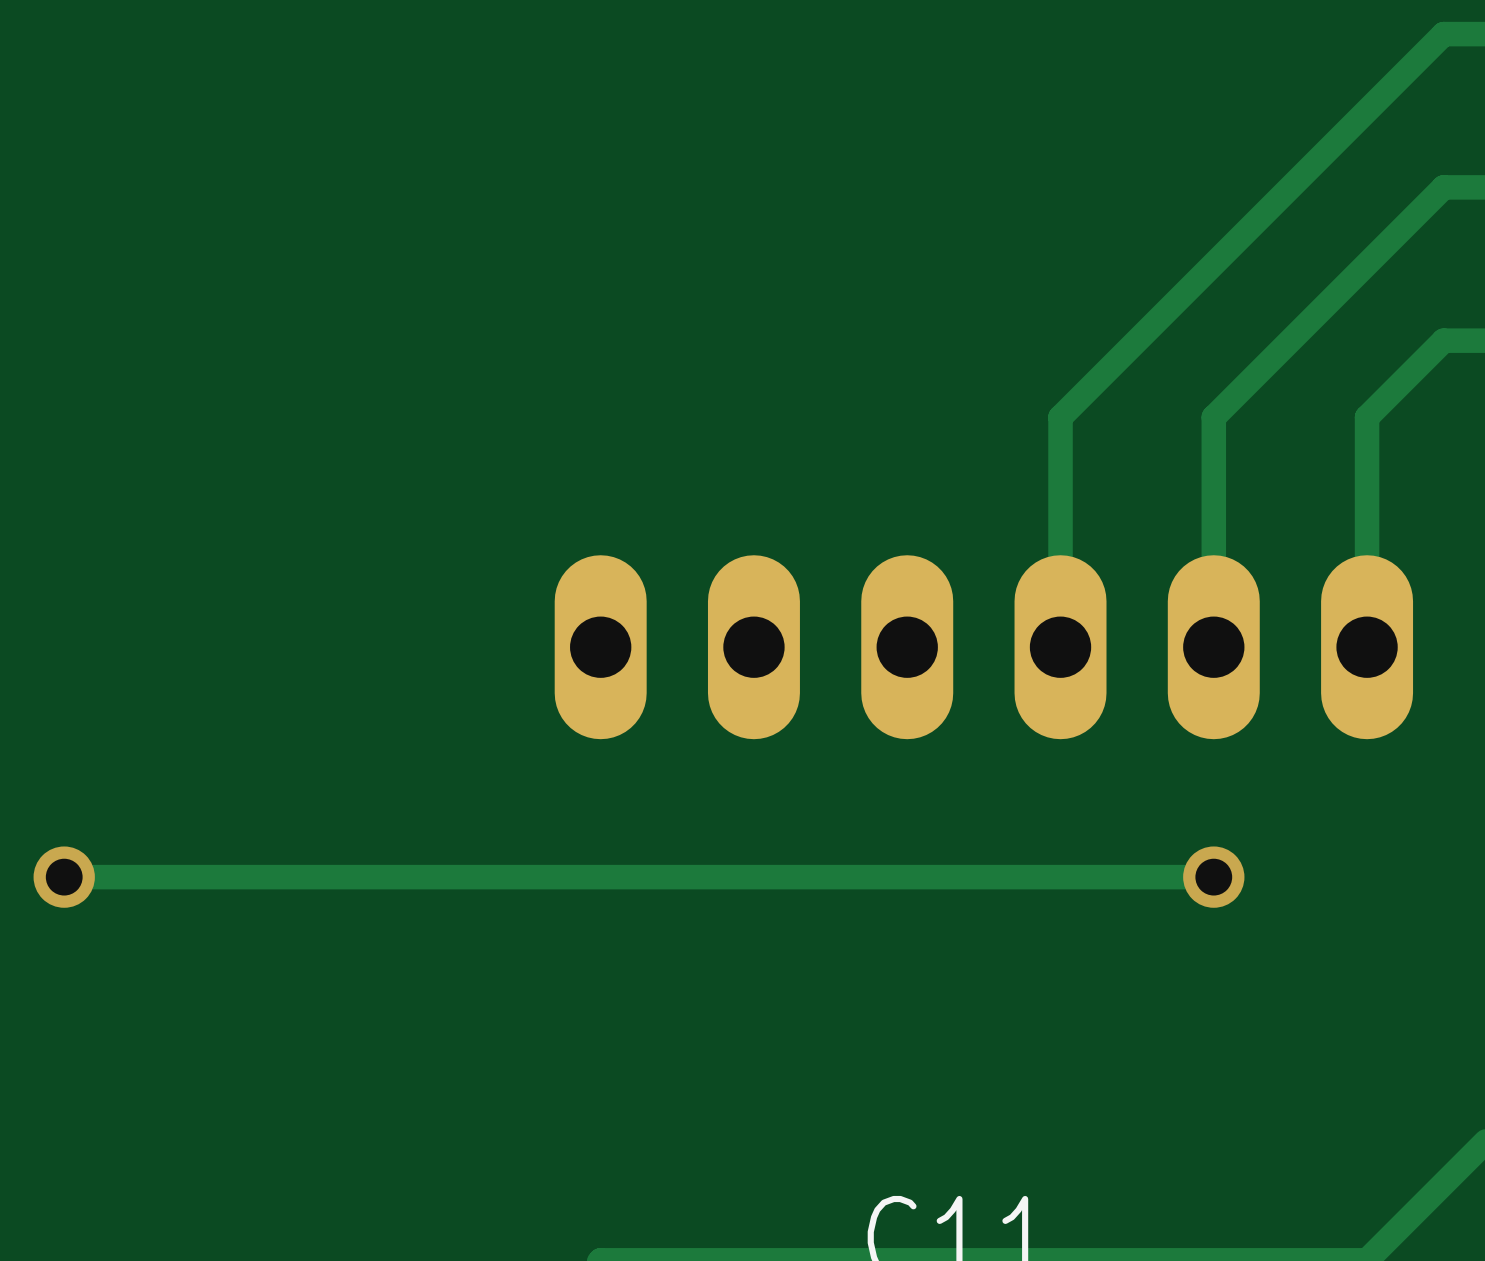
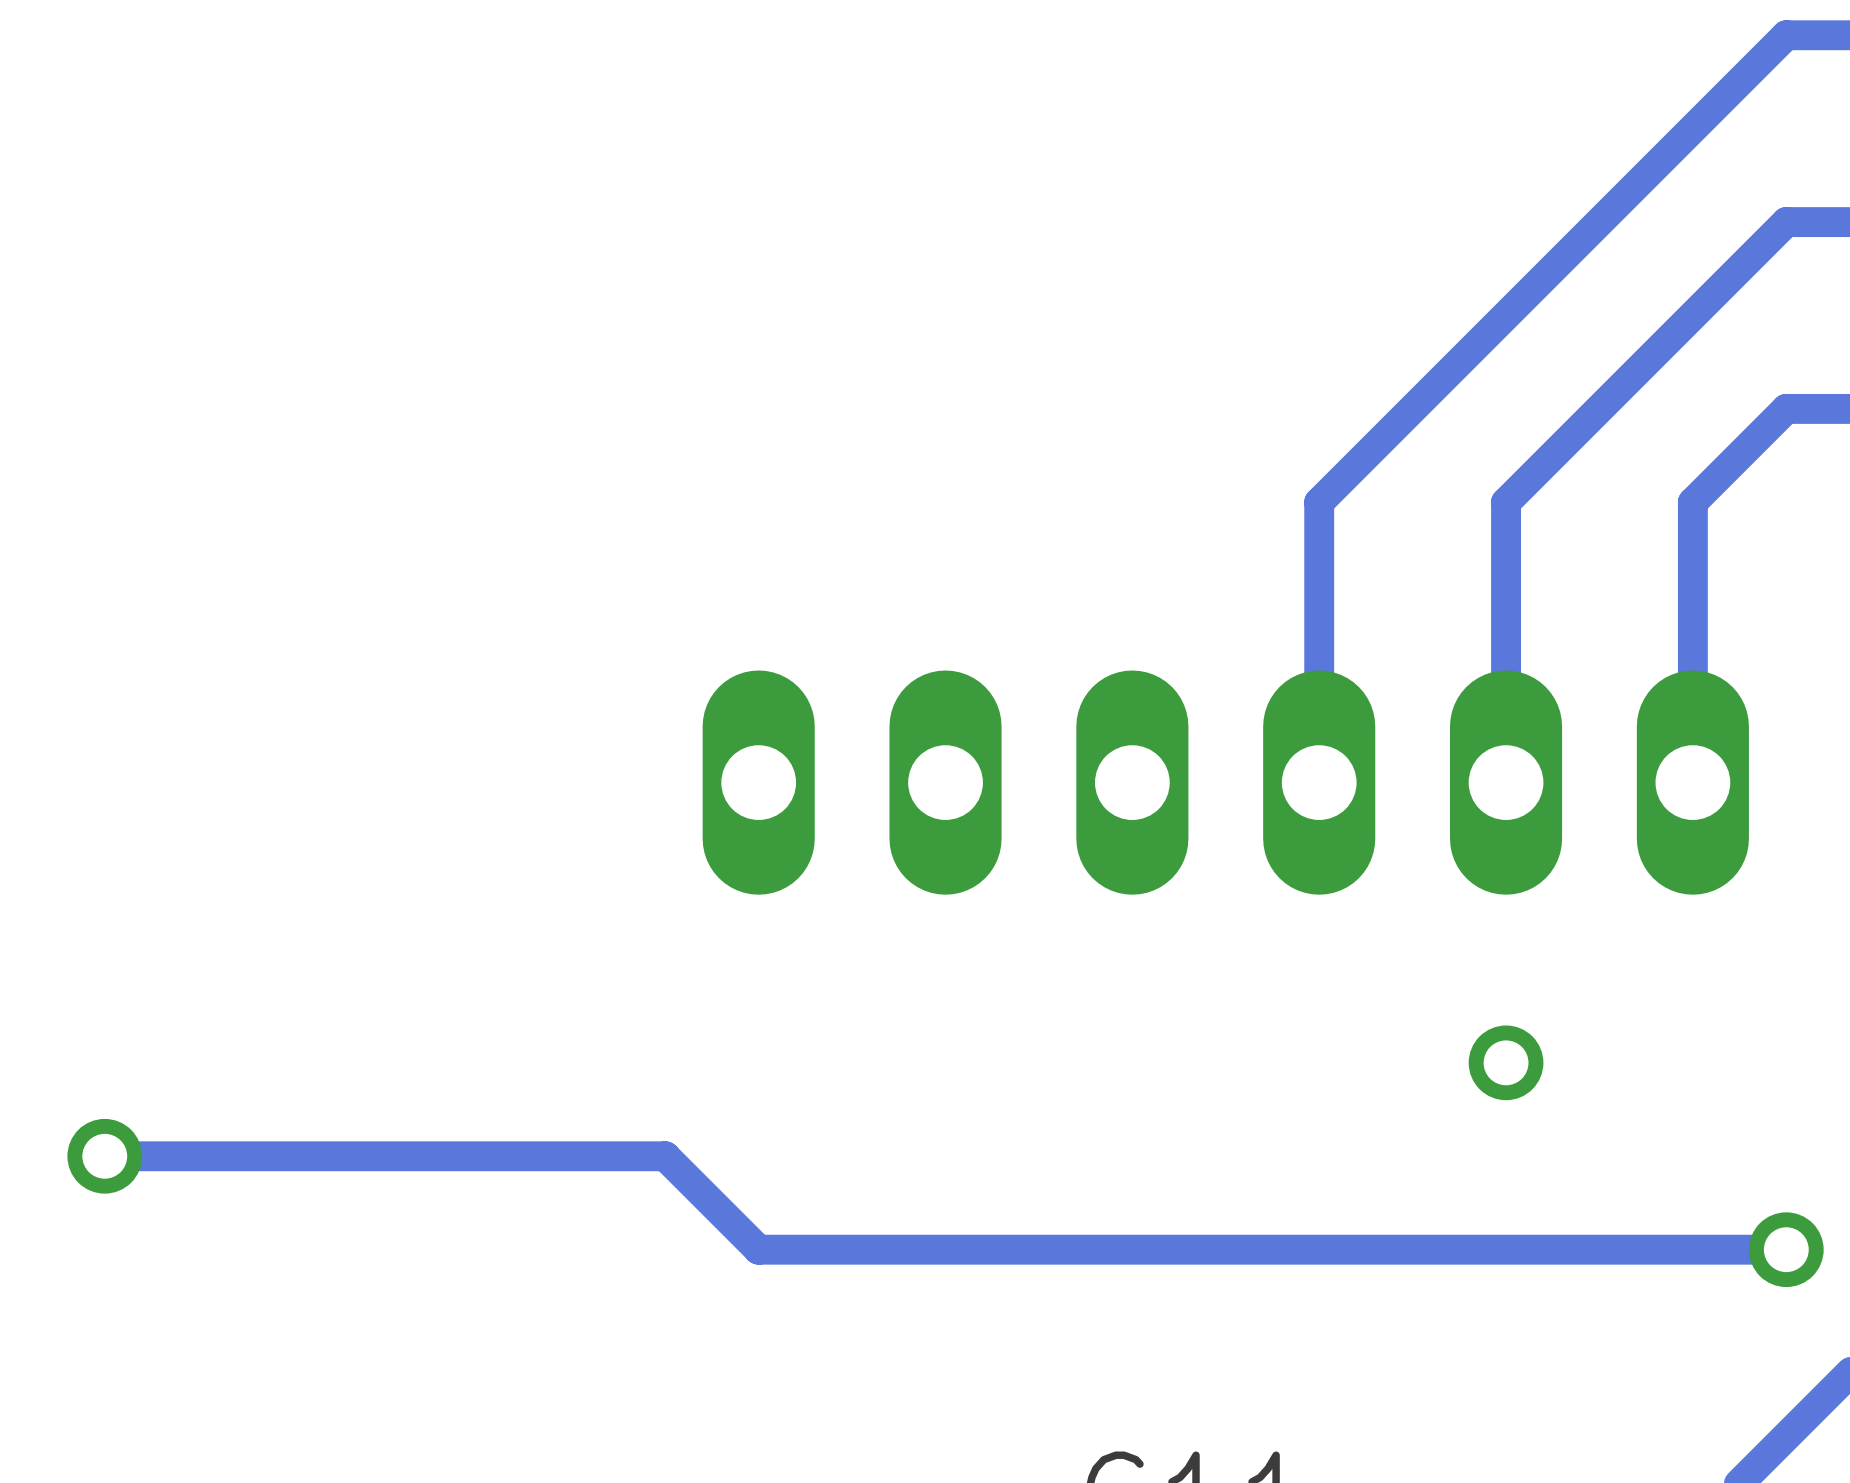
via position: (64, 877) -> (104, 1156)
track: (1213, 877) (64, 877) -> none
track: none -> (104, 1156) (665, 1156) (758, 1249) (1786, 1249)
via: none -> (1786, 1249)

